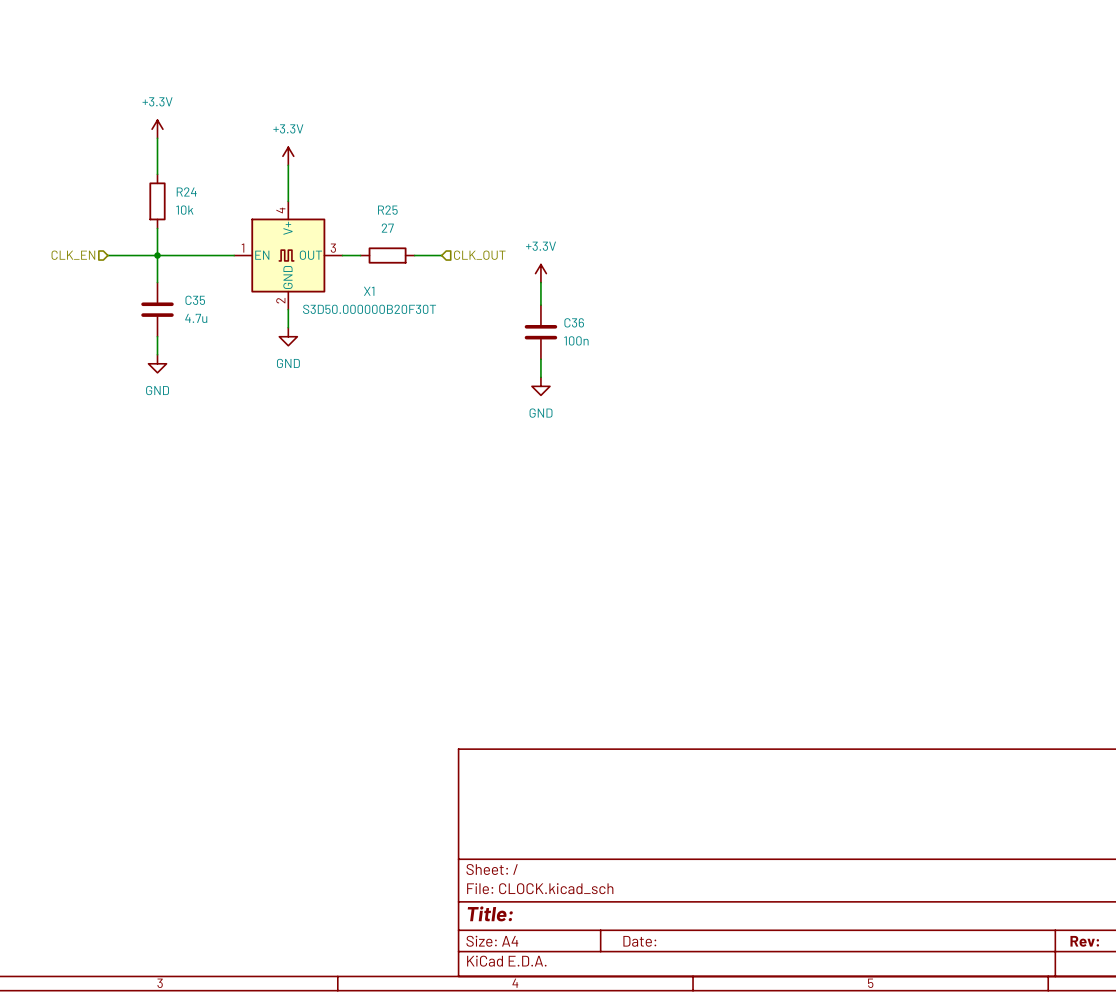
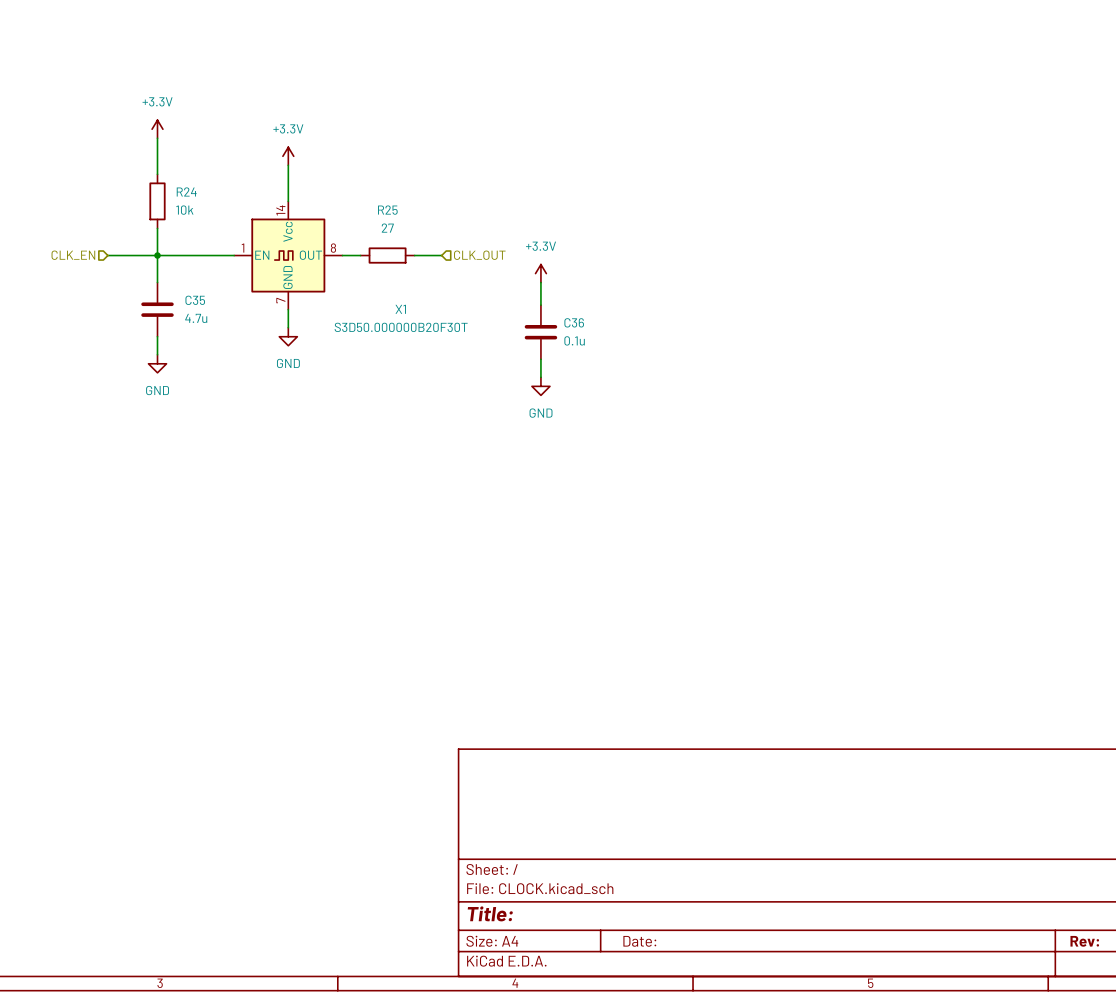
X1 symbol: [234, 201, 343, 310] -> [234, 201, 343, 310]
X1 name position: X1 (369, 291) -> X1 (400, 309)
X1 value position: S3D50.000000B20F30T (369, 309) -> S3D50.000000B20F30T (401, 327)
C36 value: 100n (576, 340) -> 0.1u (574, 340)

